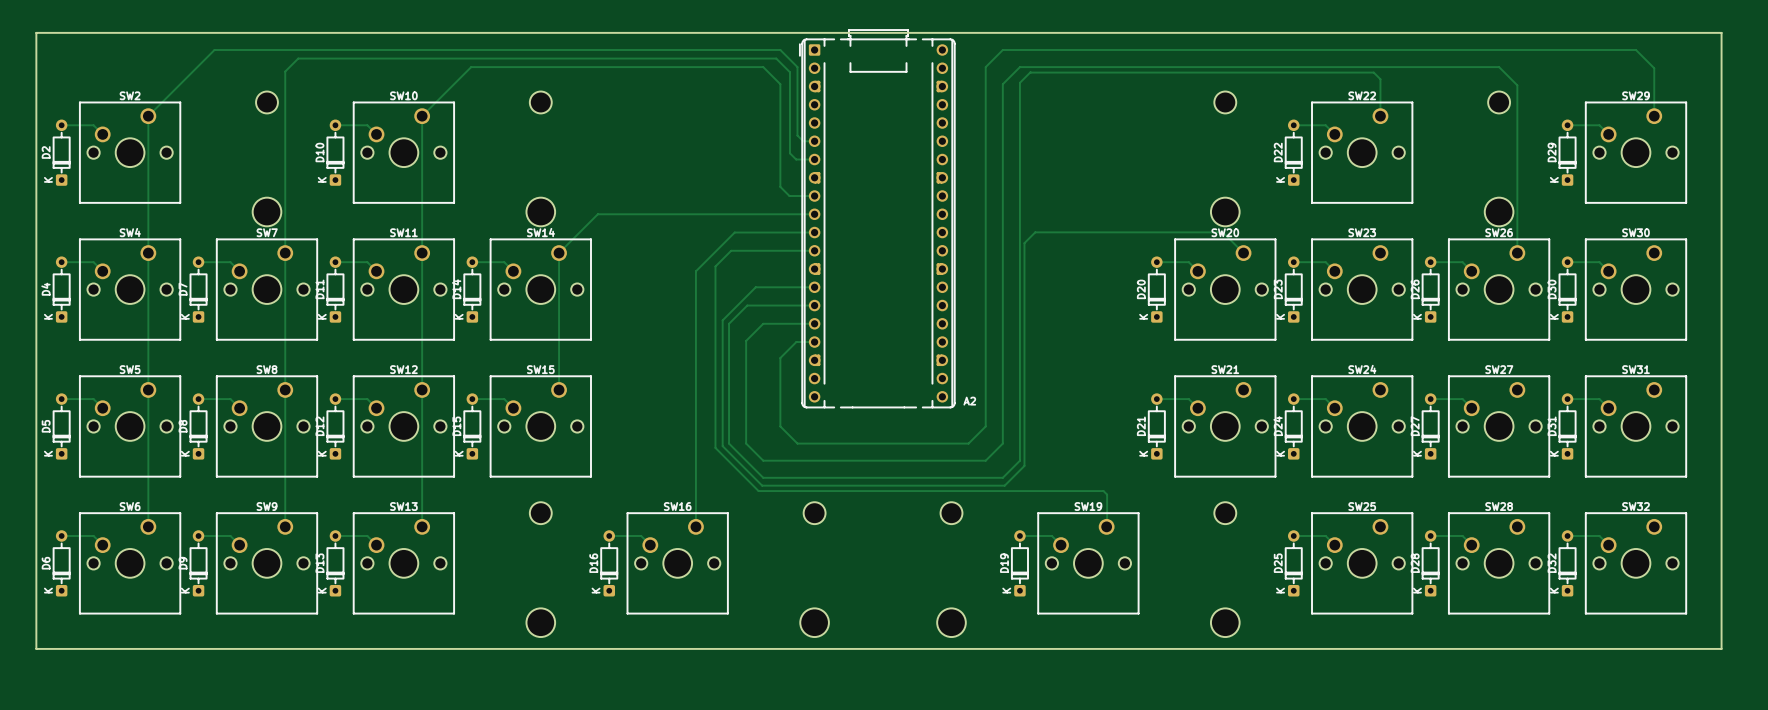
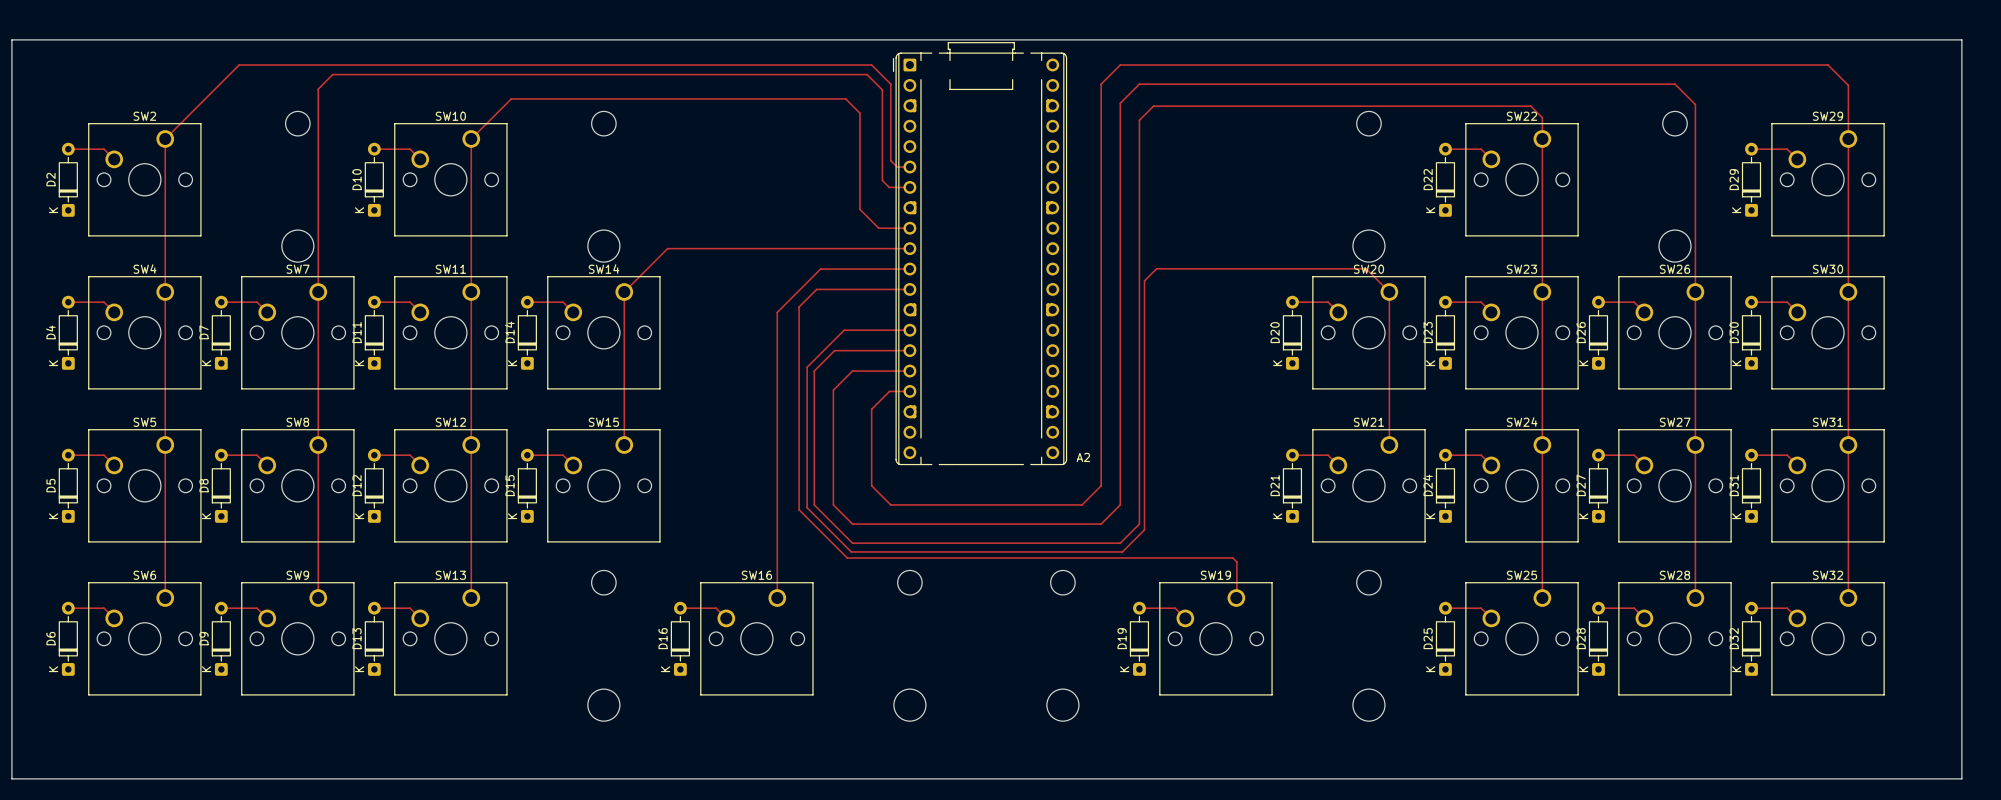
board edge: (36, 32) (1721, 32) (1721, 648) (36, 648) (36, 32) -> (11, 39) (11, 778) (1961, 778) (1961, 39) (11, 39)
track: (457, 80) (471, 67) (763, 67) (780, 84) (780, 186) (789, 196) -> (511, 98) (845, 98) (859, 113) (859, 209) (878, 228) (881, 228)
track: (1380, 97) (1380, 79) (1373, 72) (1030, 72) (1019, 82) (1019, 99) -> (1542, 117) (1530, 106) (1153, 106) (1139, 120)
track: none -> (1542, 138) (1542, 598)
track: none -> (1848, 138) (1848, 598)
track: none -> (1389, 291) (1389, 445)
track: none -> (1695, 291) (1695, 598)

